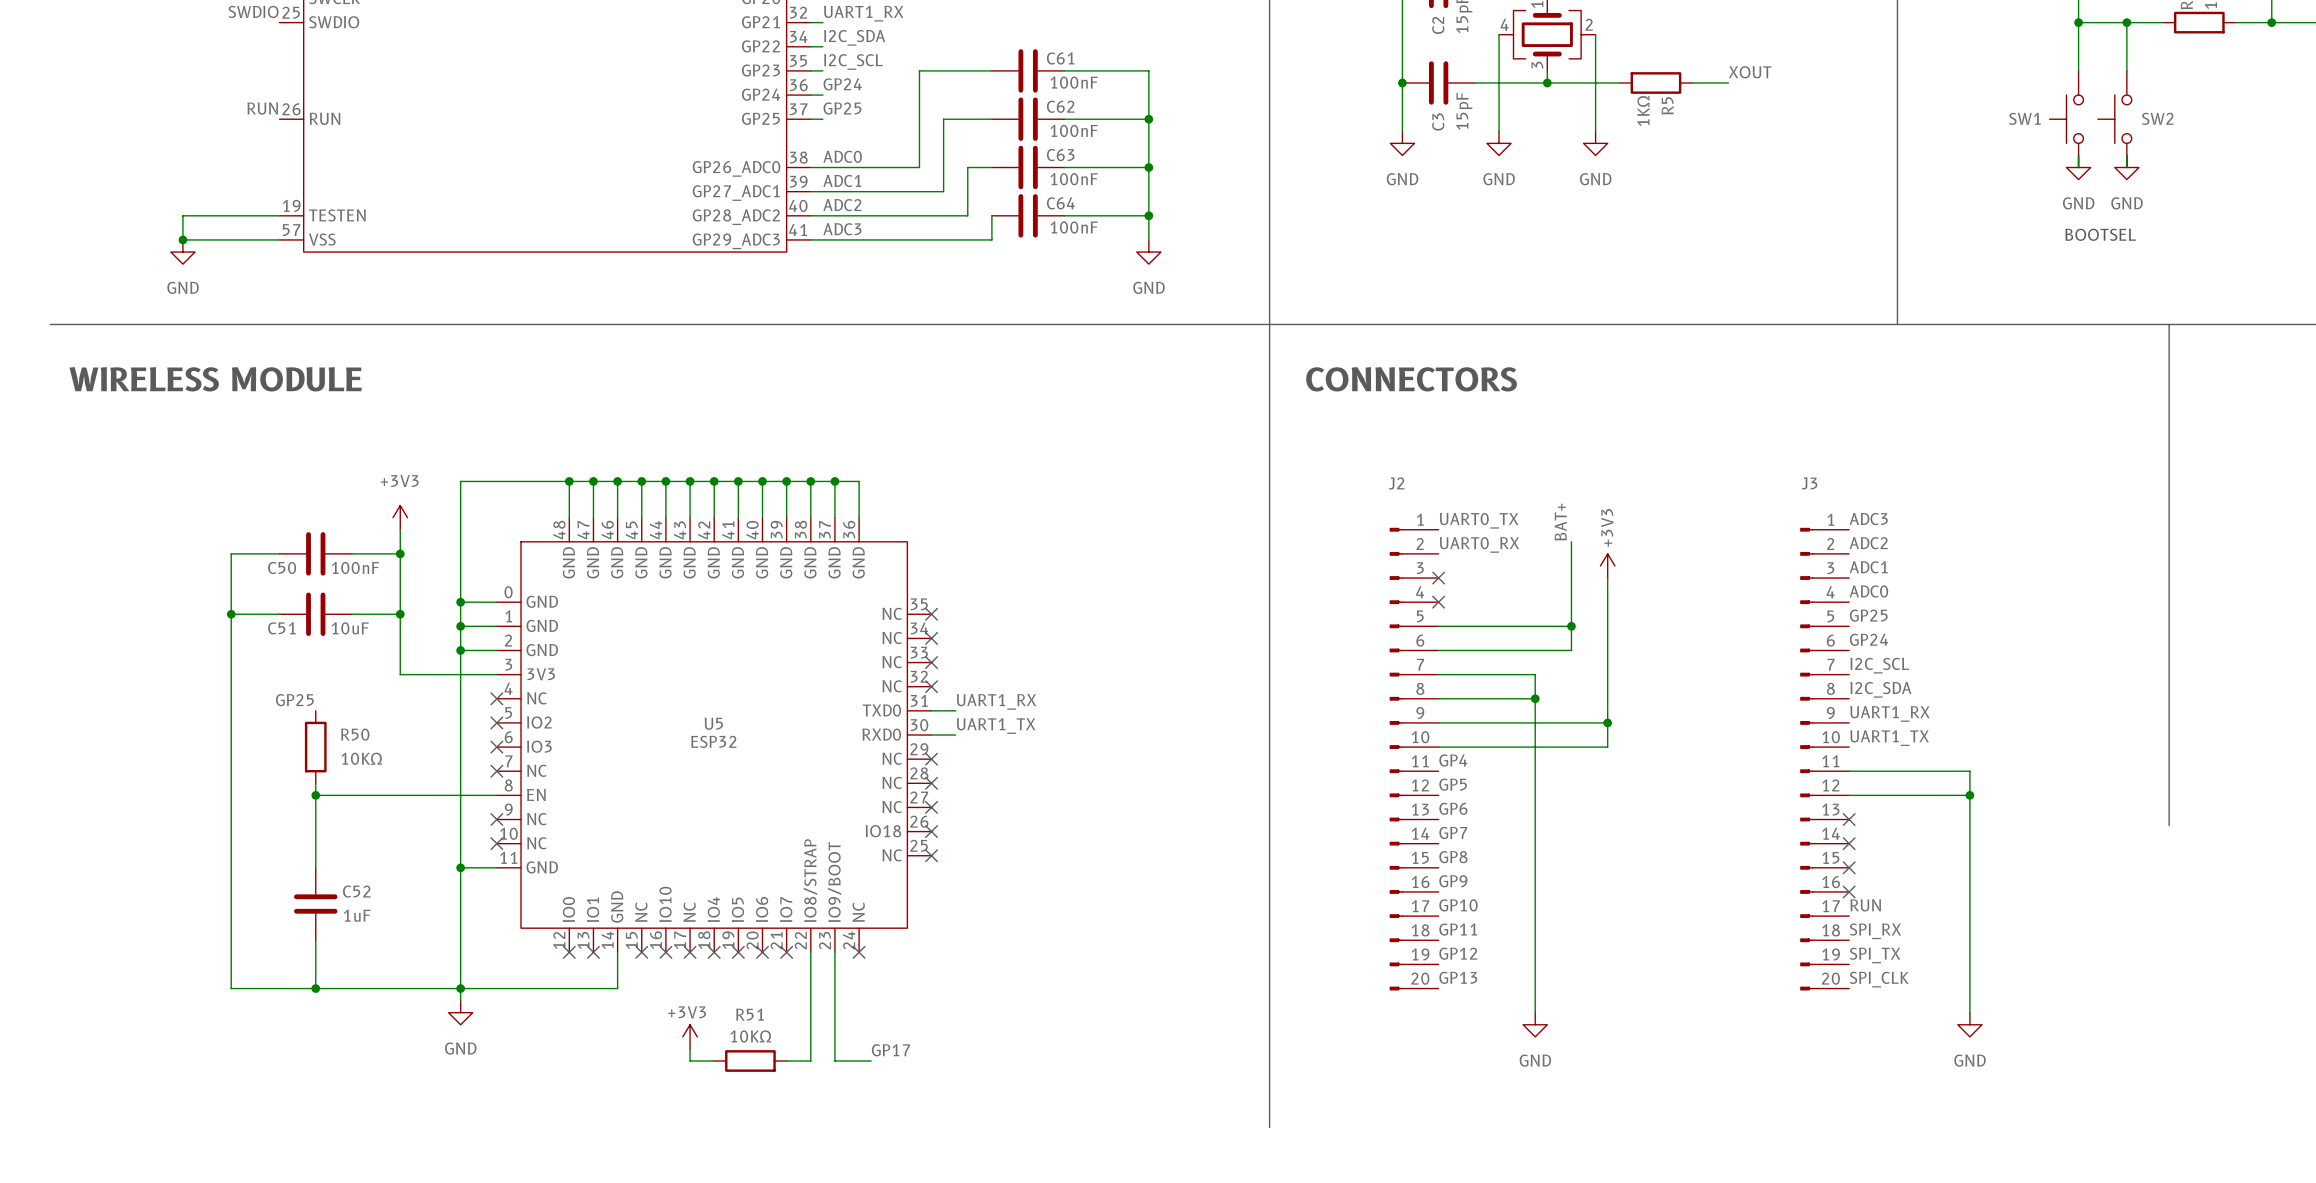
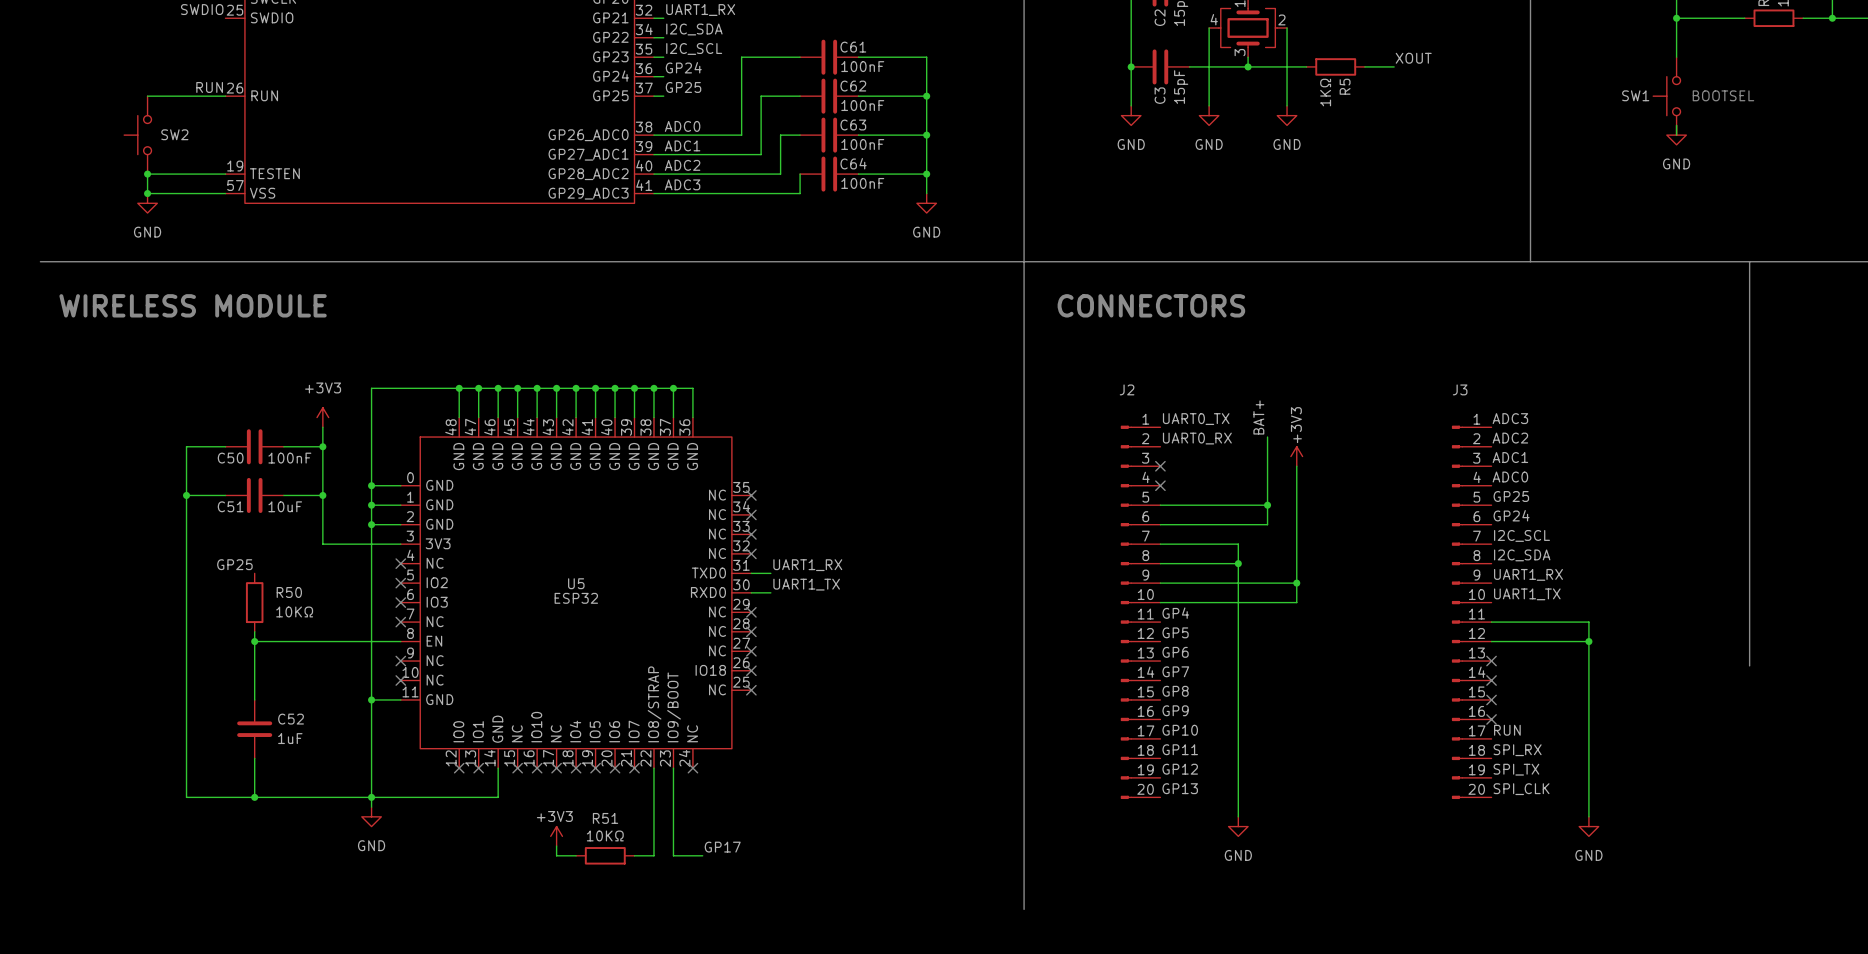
wire: (2126, 22) (2126, 70) -> none
junction: (2126, 22) -> none
wire: none -> (147, 96) (225, 96)
SW2 position: (2114, 119) -> (137, 135)
wire: (2126, 155) (2126, 167) -> none
power symbol: GND (2126, 167) -> none
junction: none -> (147, 174)
text position: BOOTSEL (2100, 234) -> BOOTSEL (1723, 95)

